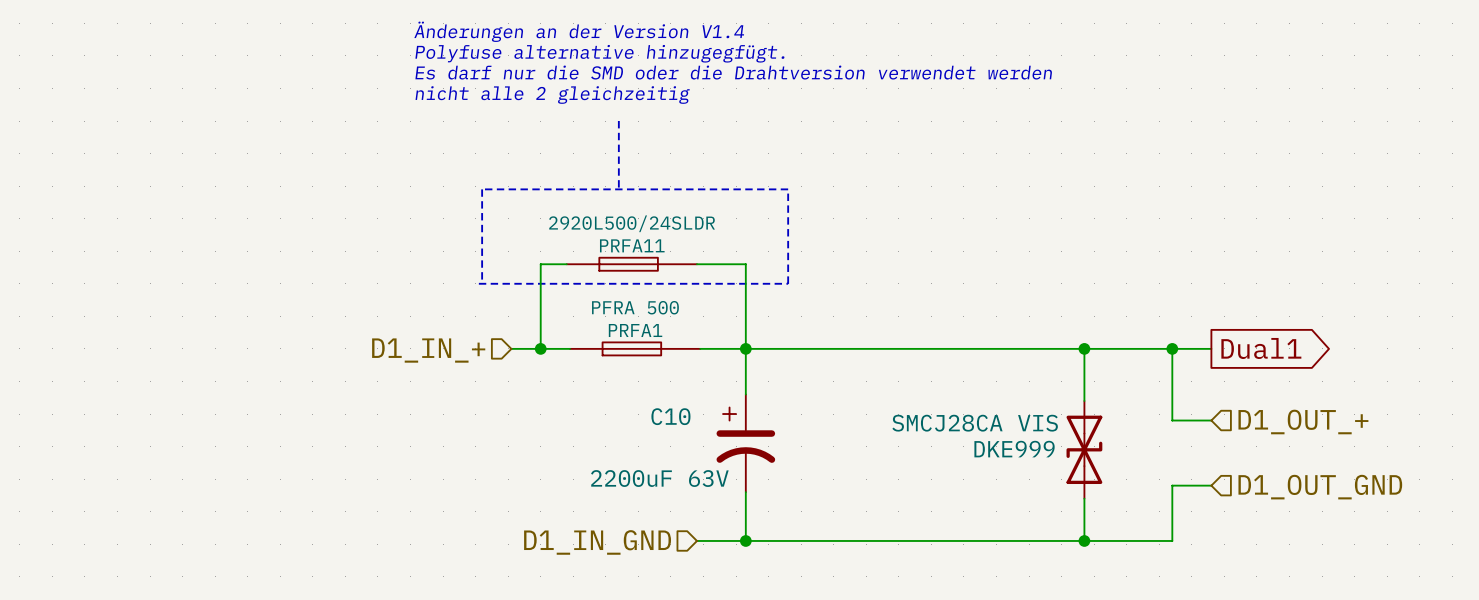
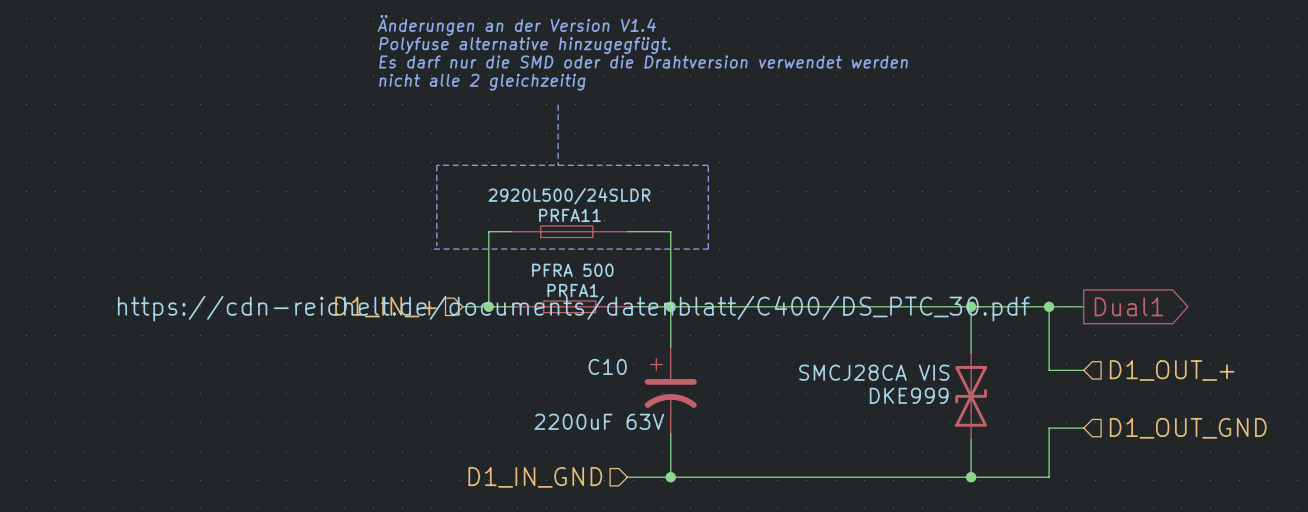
PRFA1 text: none -> https://cdn-reichelt.de/documents/datenblatt/C400/DS_PTC_30.pdf (573, 308)

